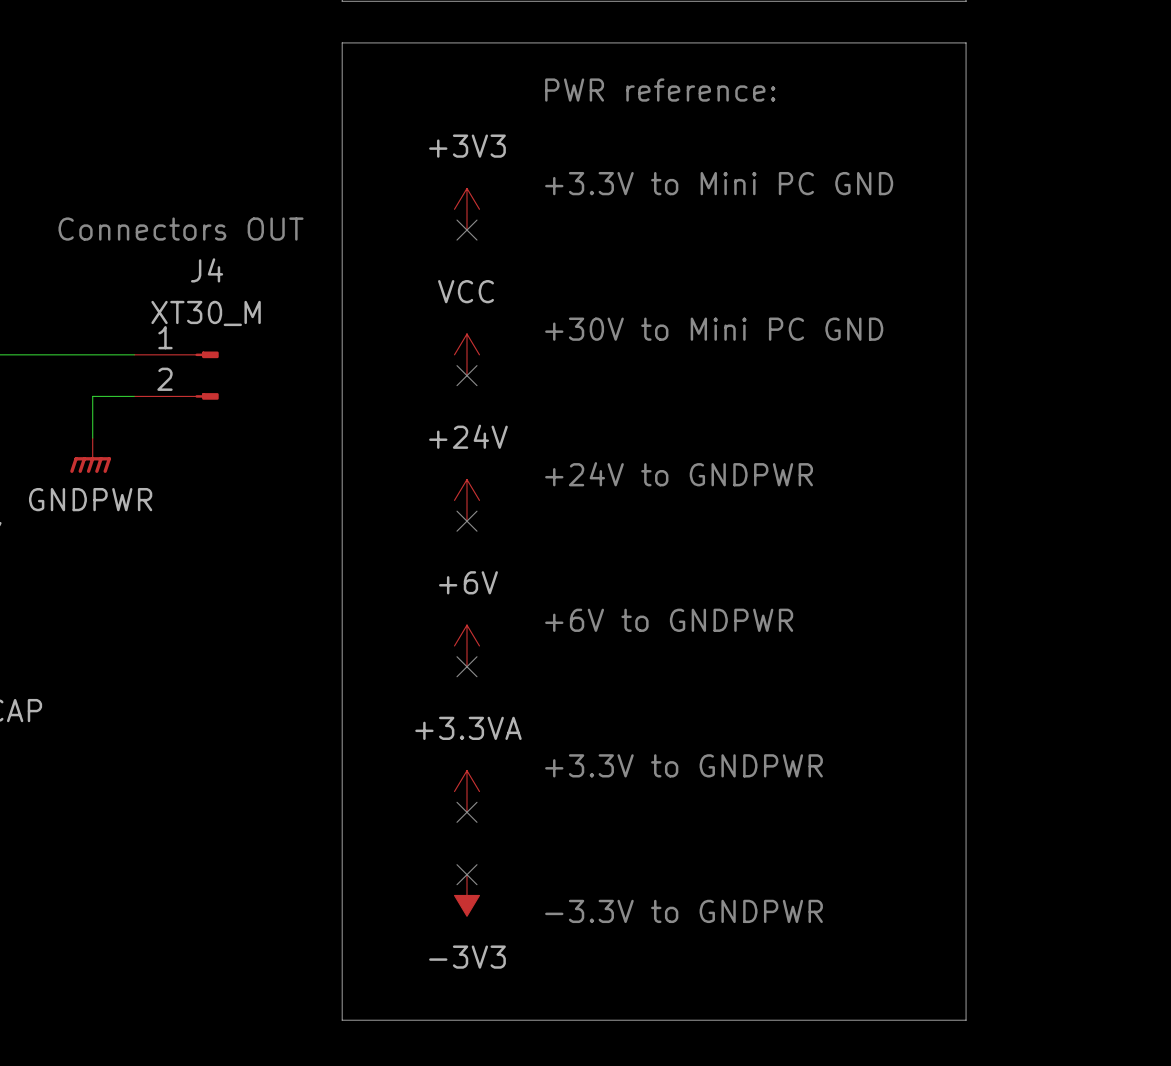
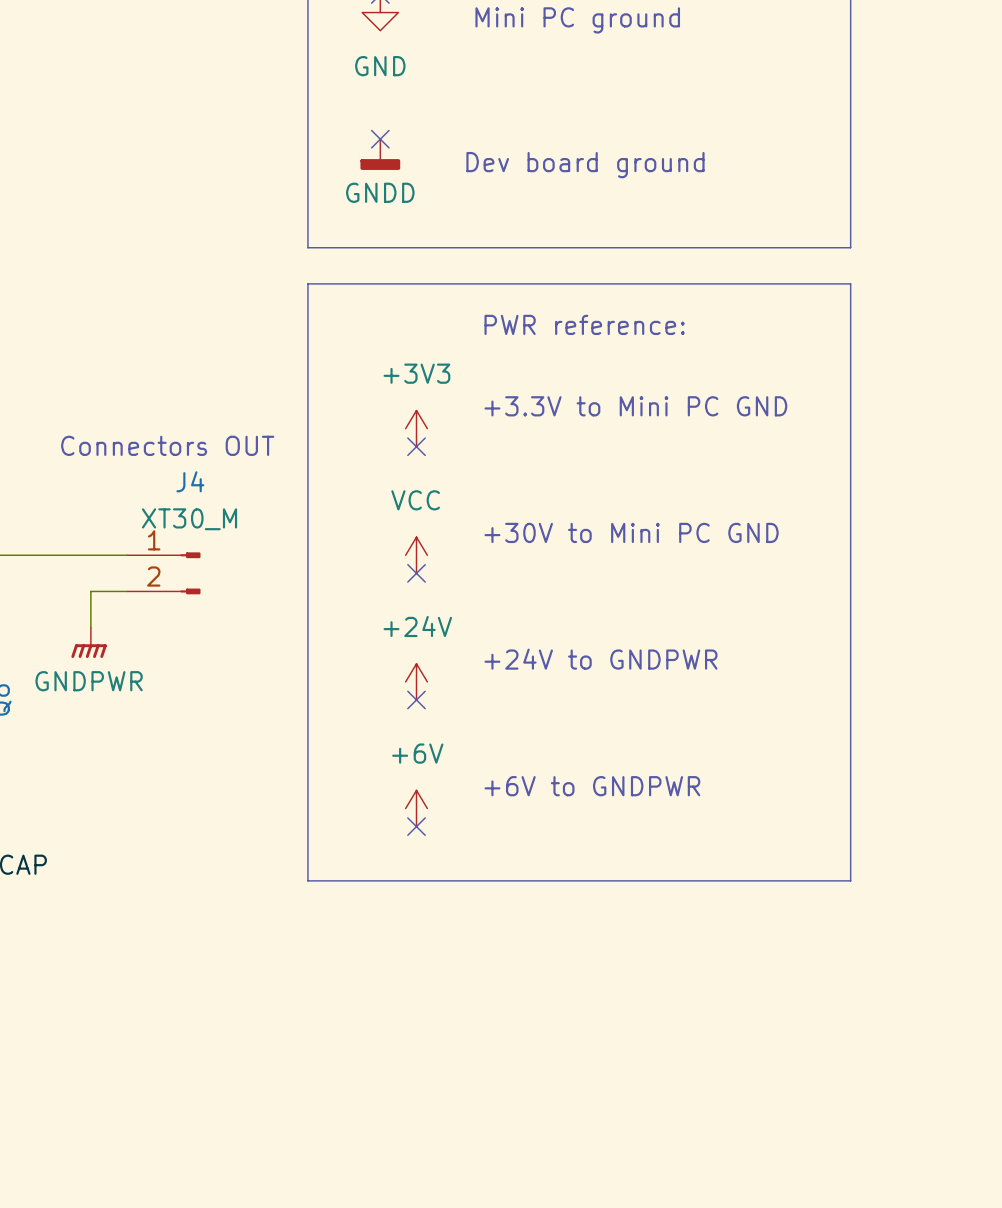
line: (342, 729) (342, 1020) (966, 1020) (966, 729) -> (307, 880) (850, 880)
text: +3.3V to GNDPWR (684, 765) -> none
power symbol: +3.3VA (466, 791) -> none
no-connect mark: (466, 812) -> none
no-connect mark: (466, 874) -> none
power symbol: -3V3 (466, 895) -> none
text: -3.3V to GNDPWR (684, 911) -> none

